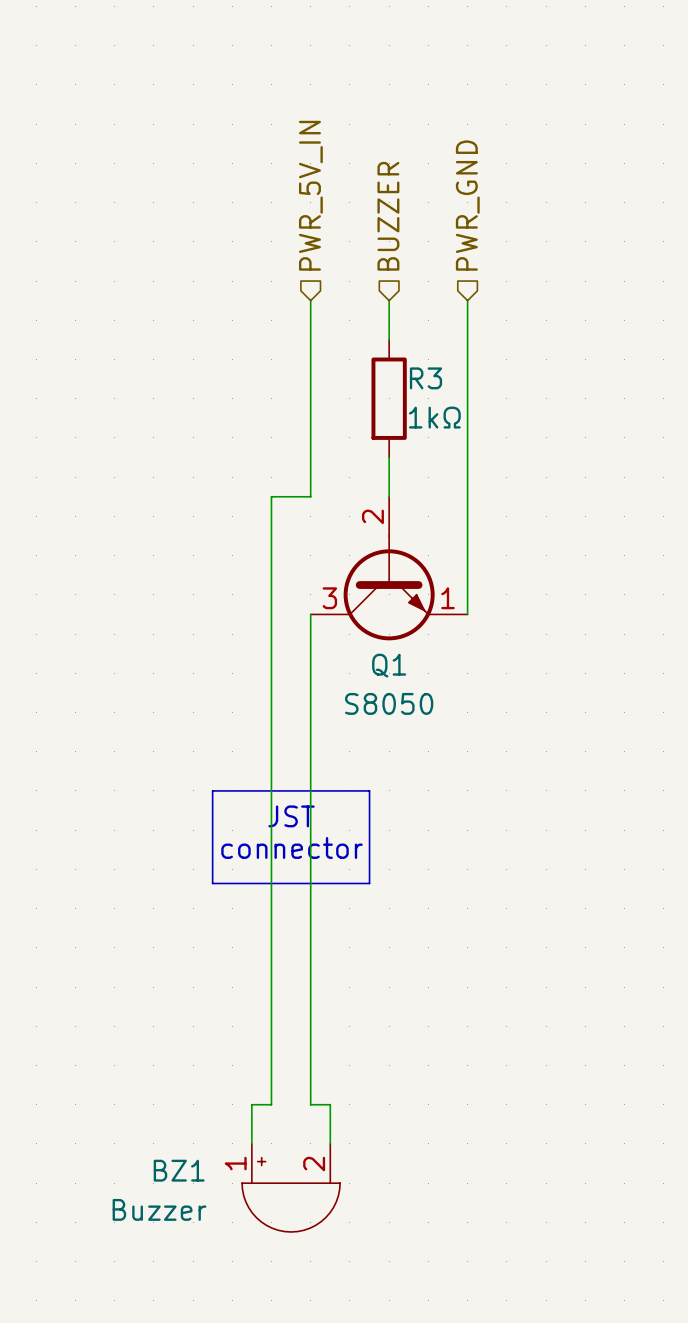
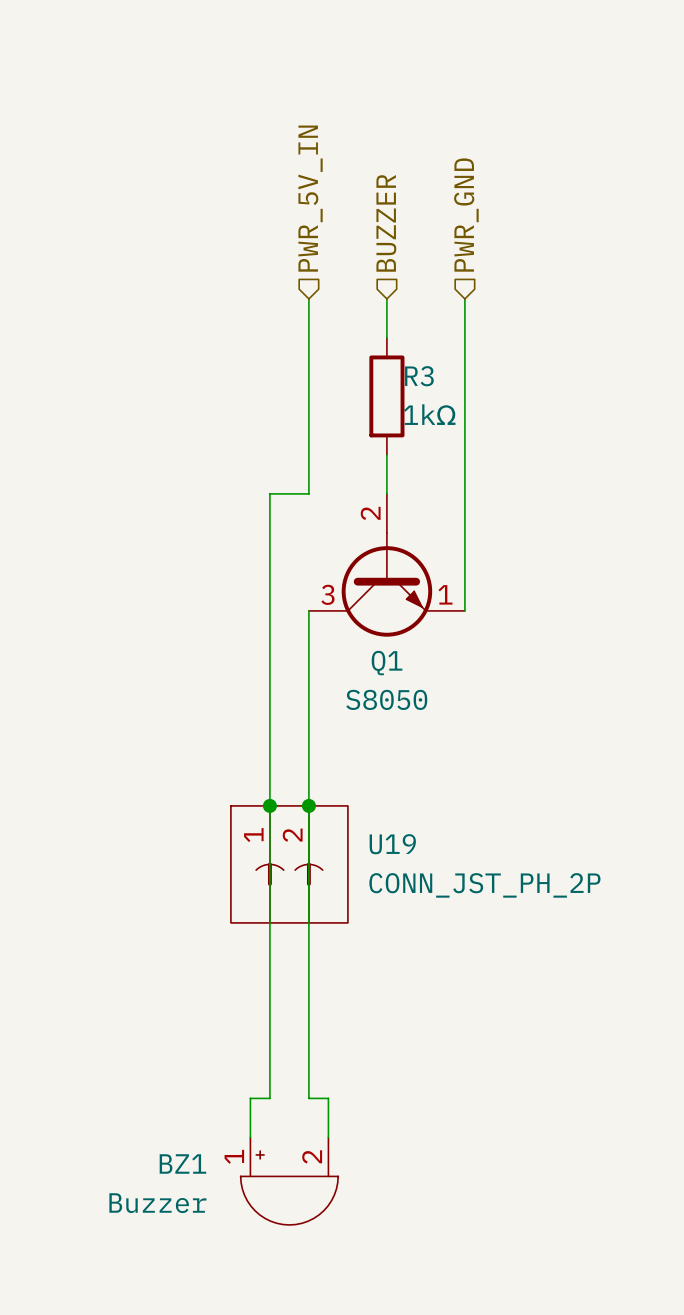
line: (212, 790) (369, 790) (369, 883) (212, 883) (212, 790) -> none
junction: none -> (269, 805)
junction: none -> (308, 805)
text: JST (291, 816) -> none
text: connector (292, 847) -> none
U19: none -> CONN_JST_PH_2P (289, 864)

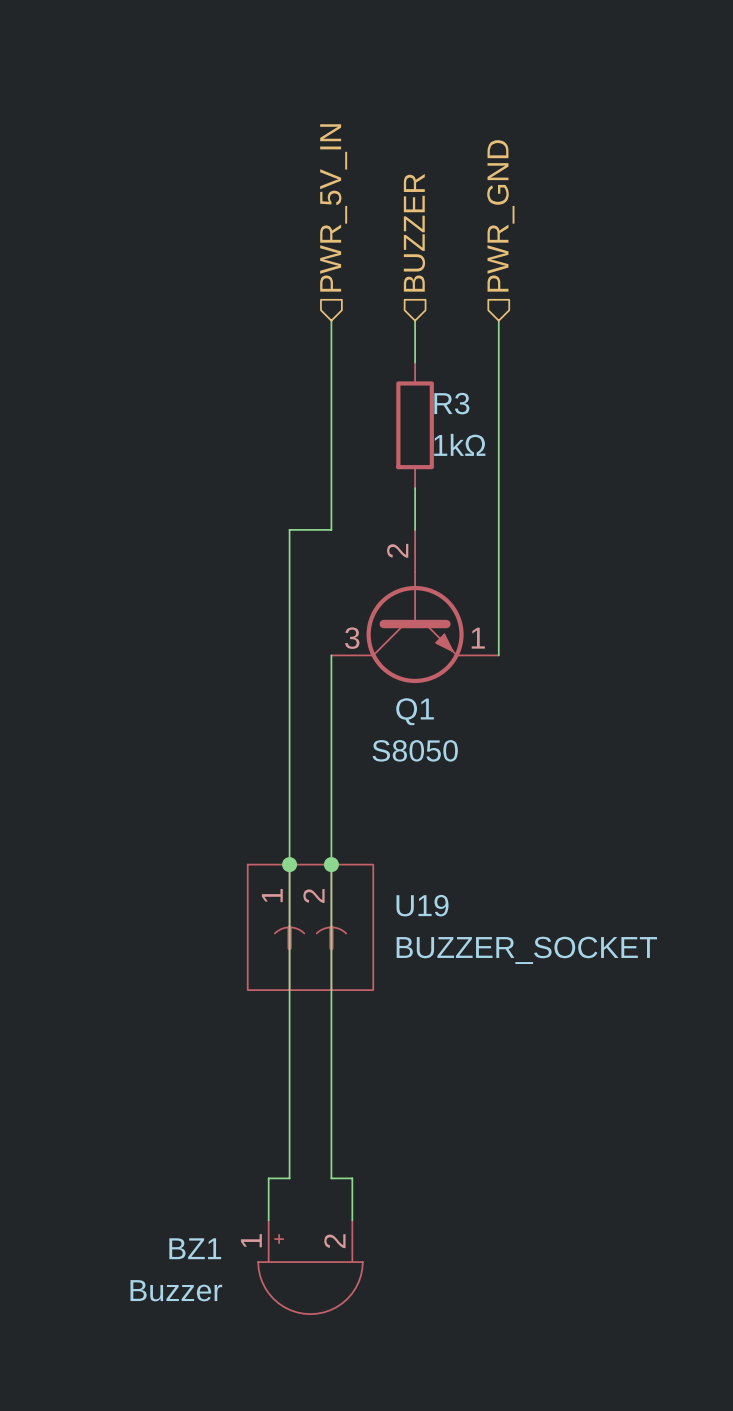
U19 value: CONN_JST_PH_2P (484, 885) -> BUZZER_SOCKET (526, 950)

